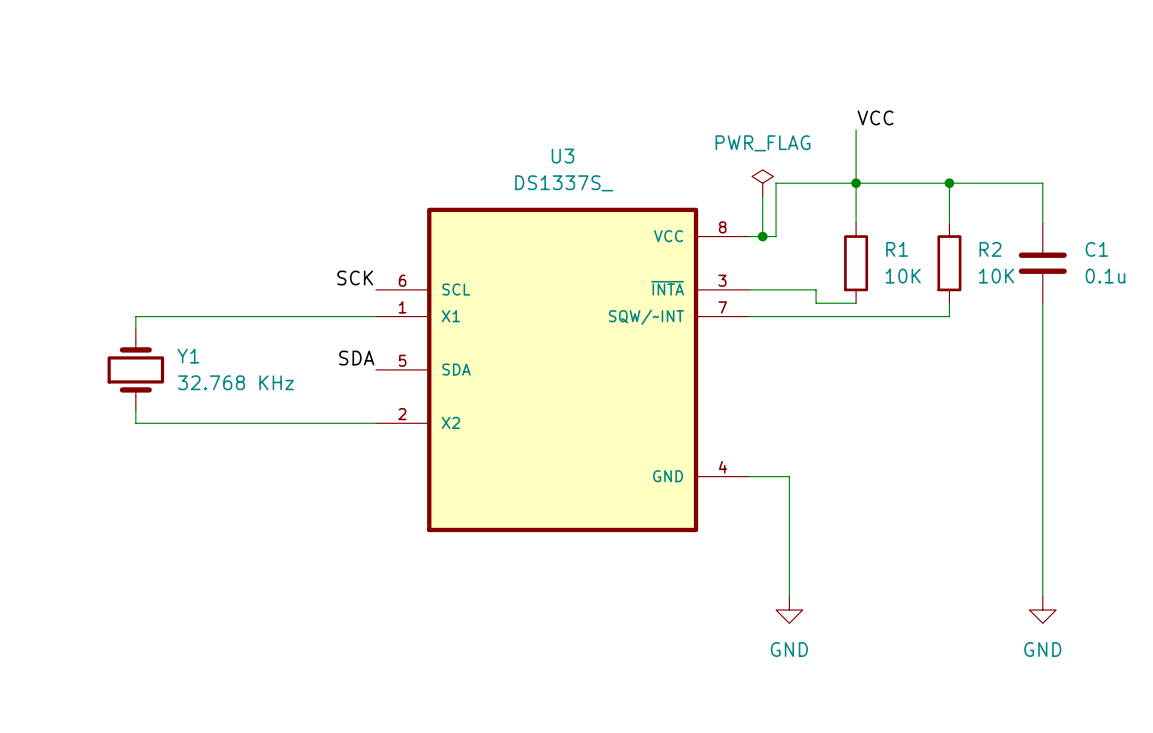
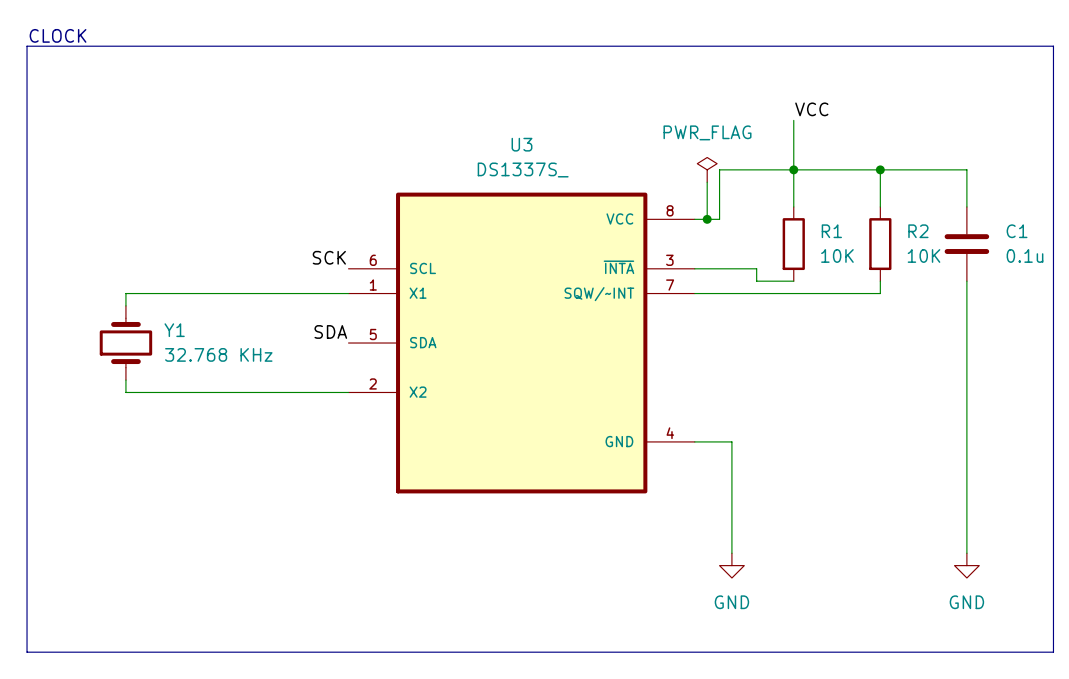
text: none -> CLOCK (58, 35)
line: none -> (27, 46) (1053, 46) (1053, 652) (27, 652) (27, 46)

